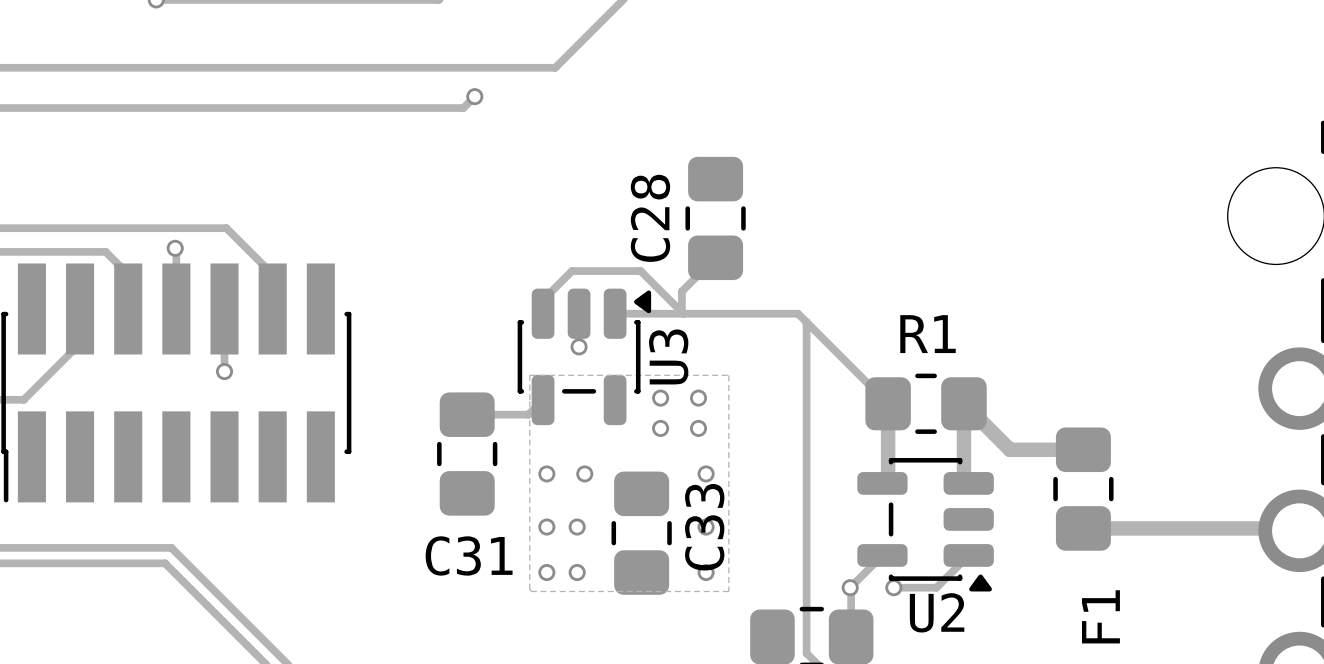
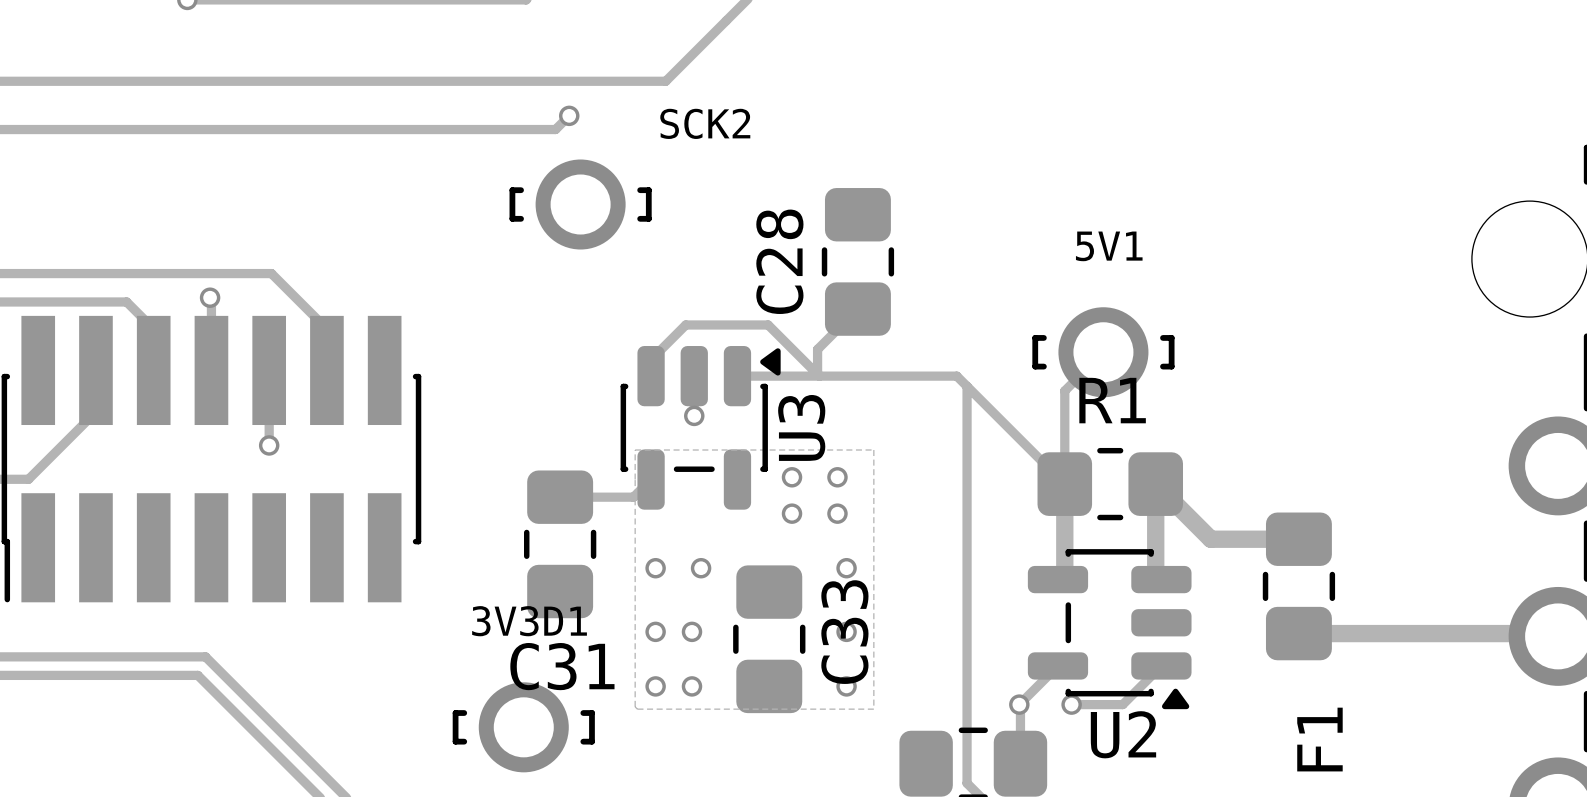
SCK2: none -> (580, 204)
track: none -> (1103, 352) (1064, 390) (1064, 484)
5V1: none -> (1103, 352)
3V3D1: none -> (523, 727)

